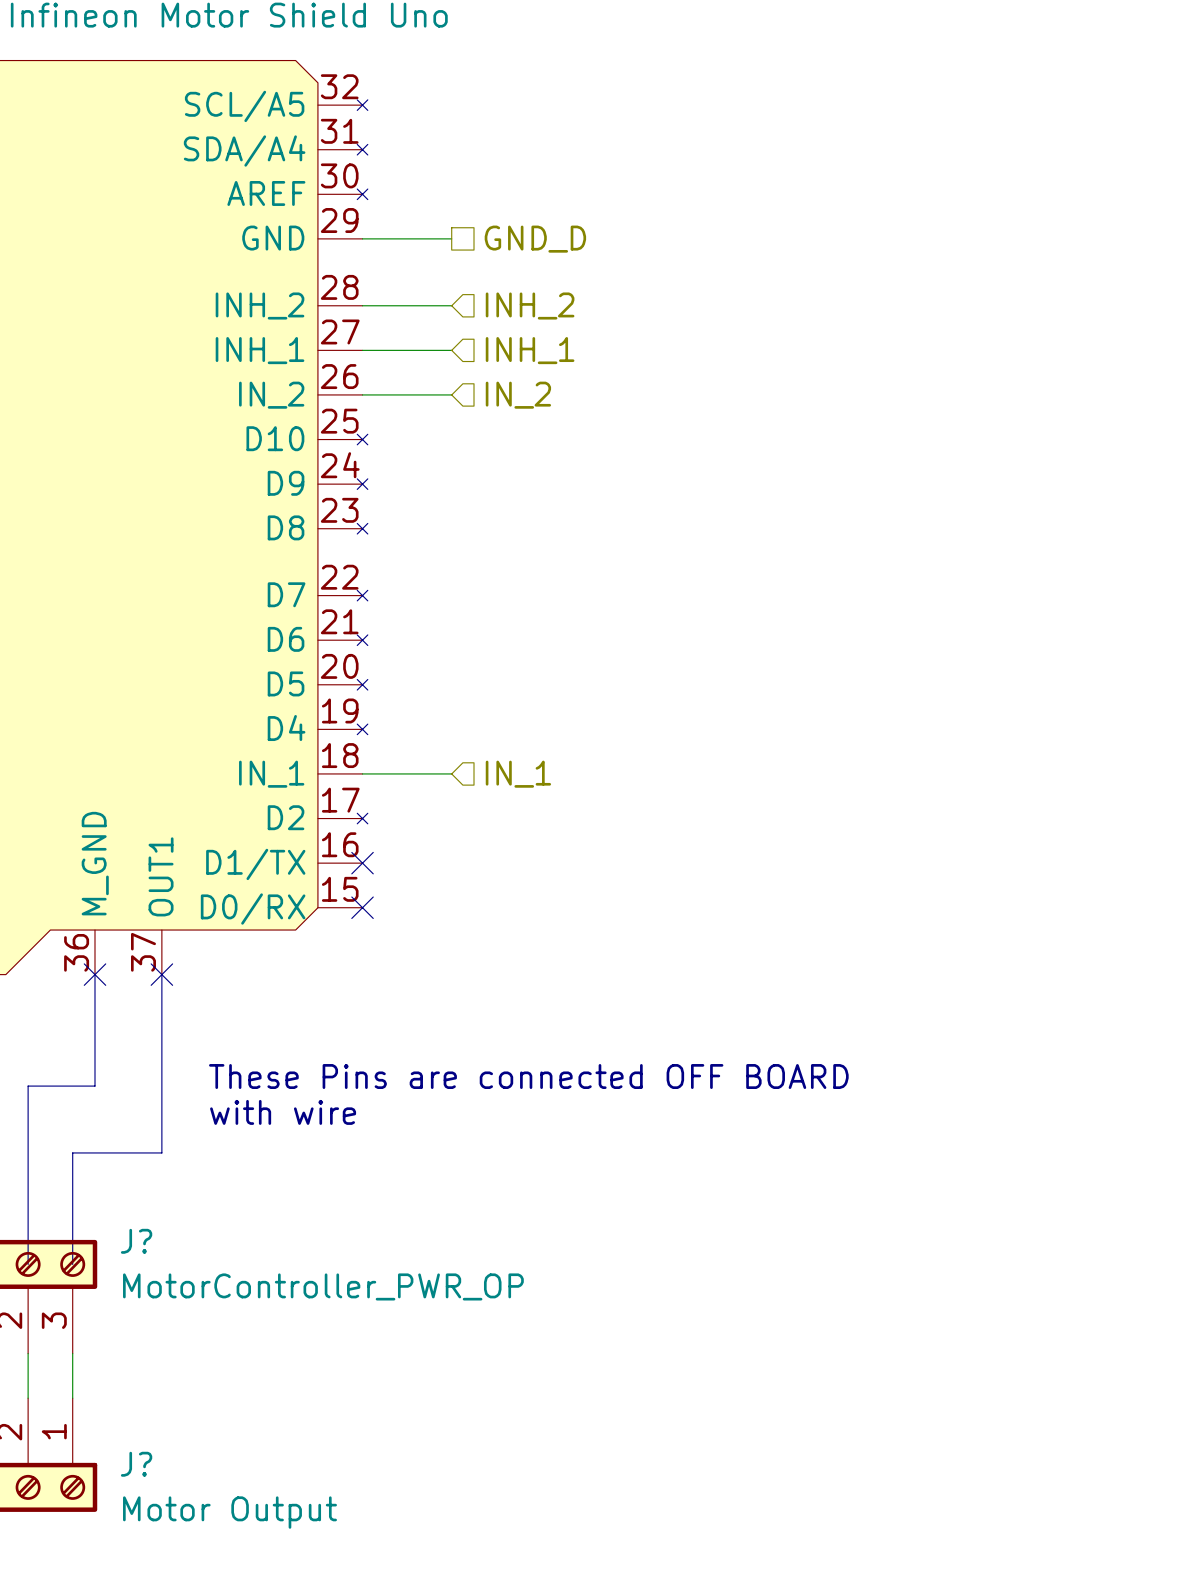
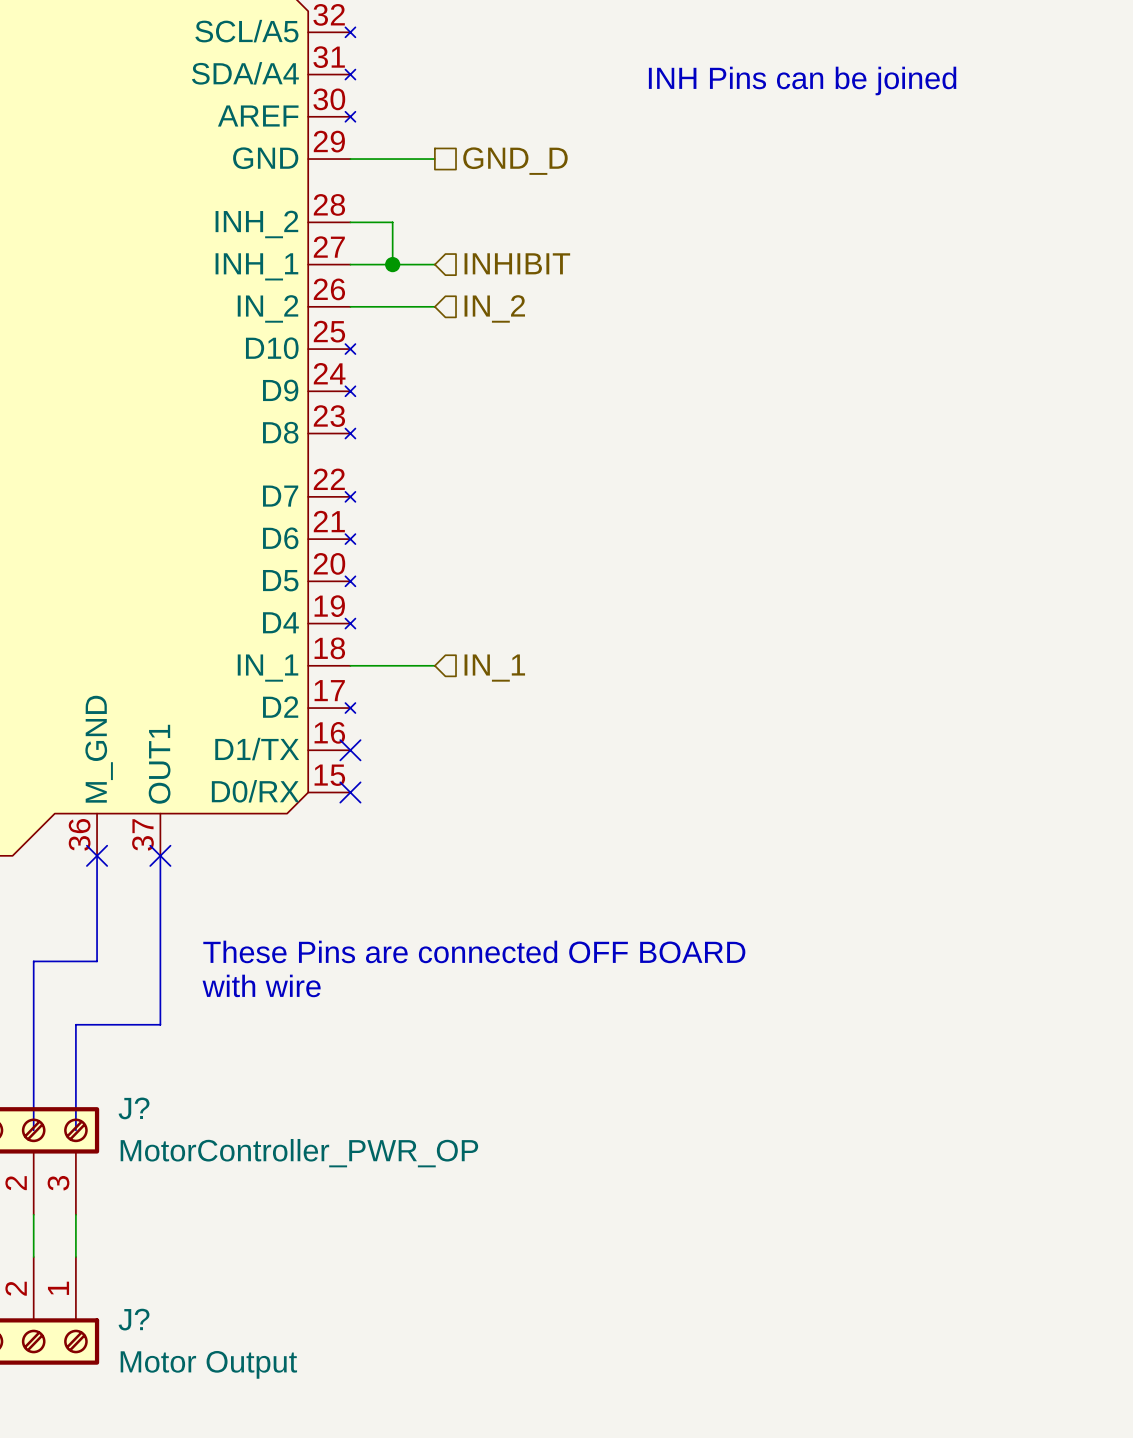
text: none -> INH Pins can be joined (802, 80)
wire: (407, 305) (451, 305) -> (392, 222) (392, 264)
hierarchical label: INH_2 (530, 306) -> none
junction: none -> (392, 264)
hierarchical label: INH_1 (530, 350) -> INHIBIT (517, 263)

